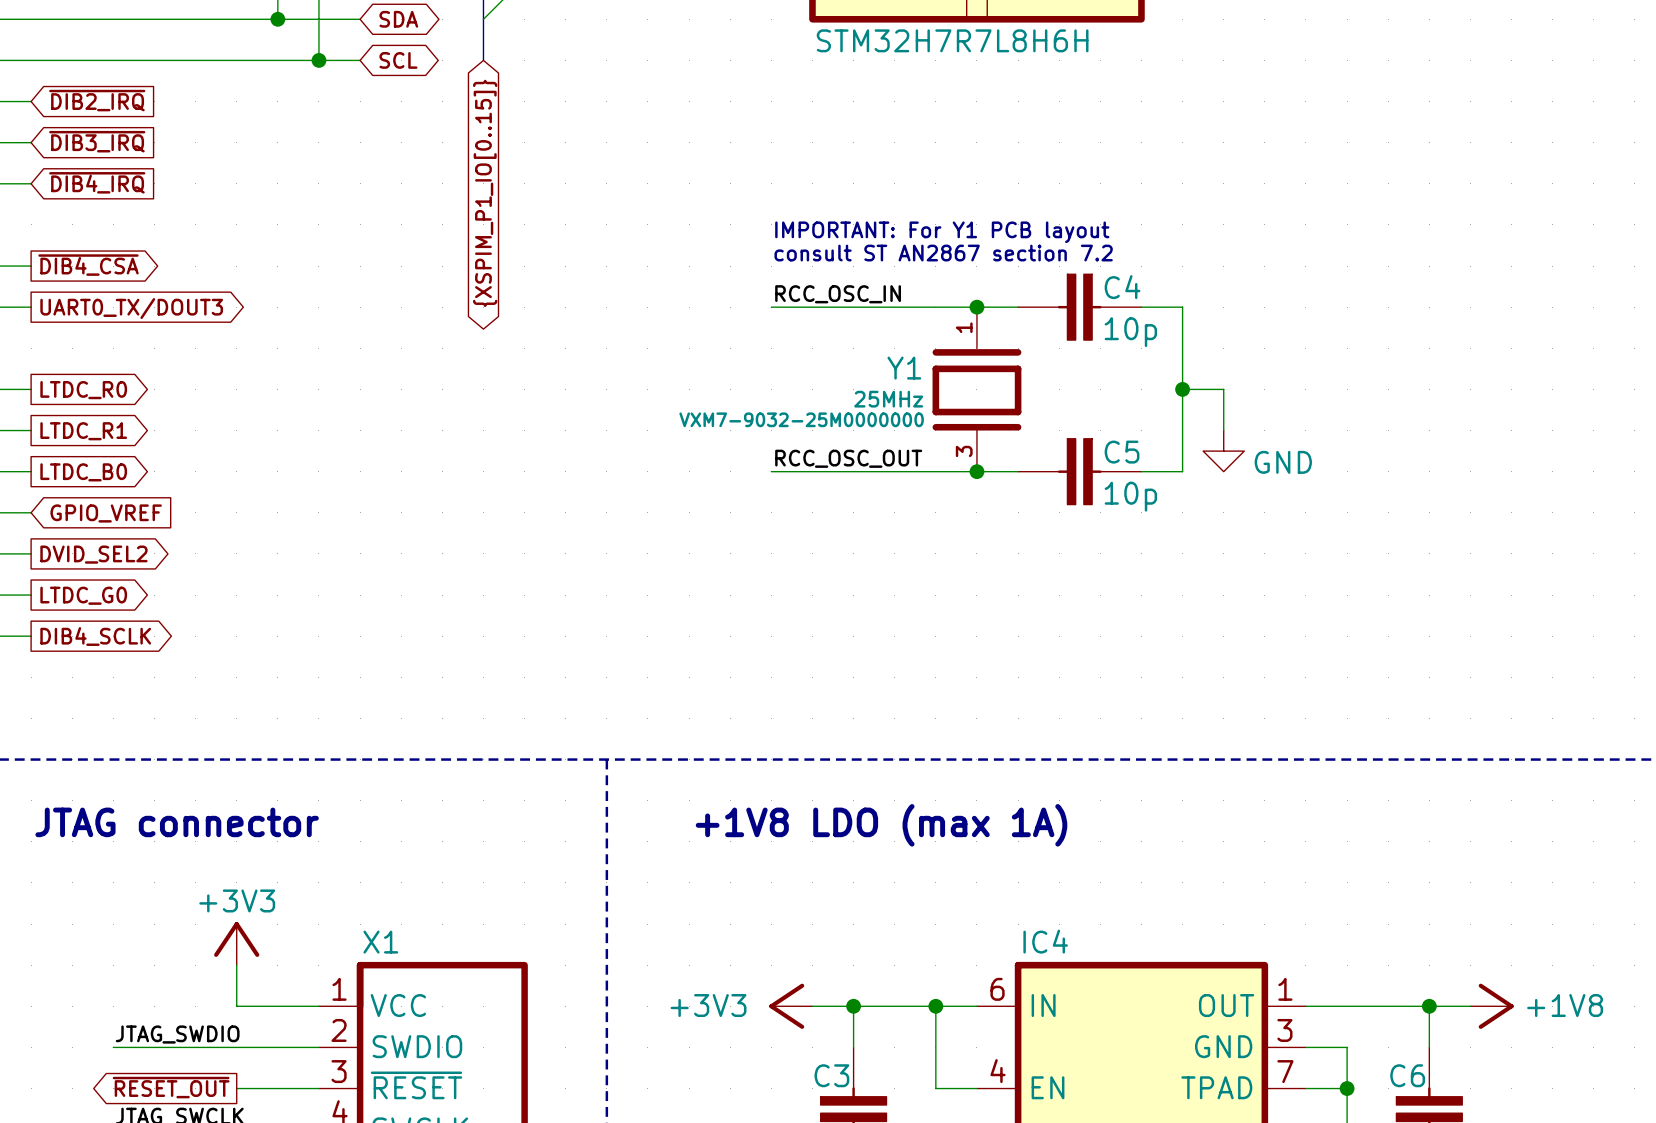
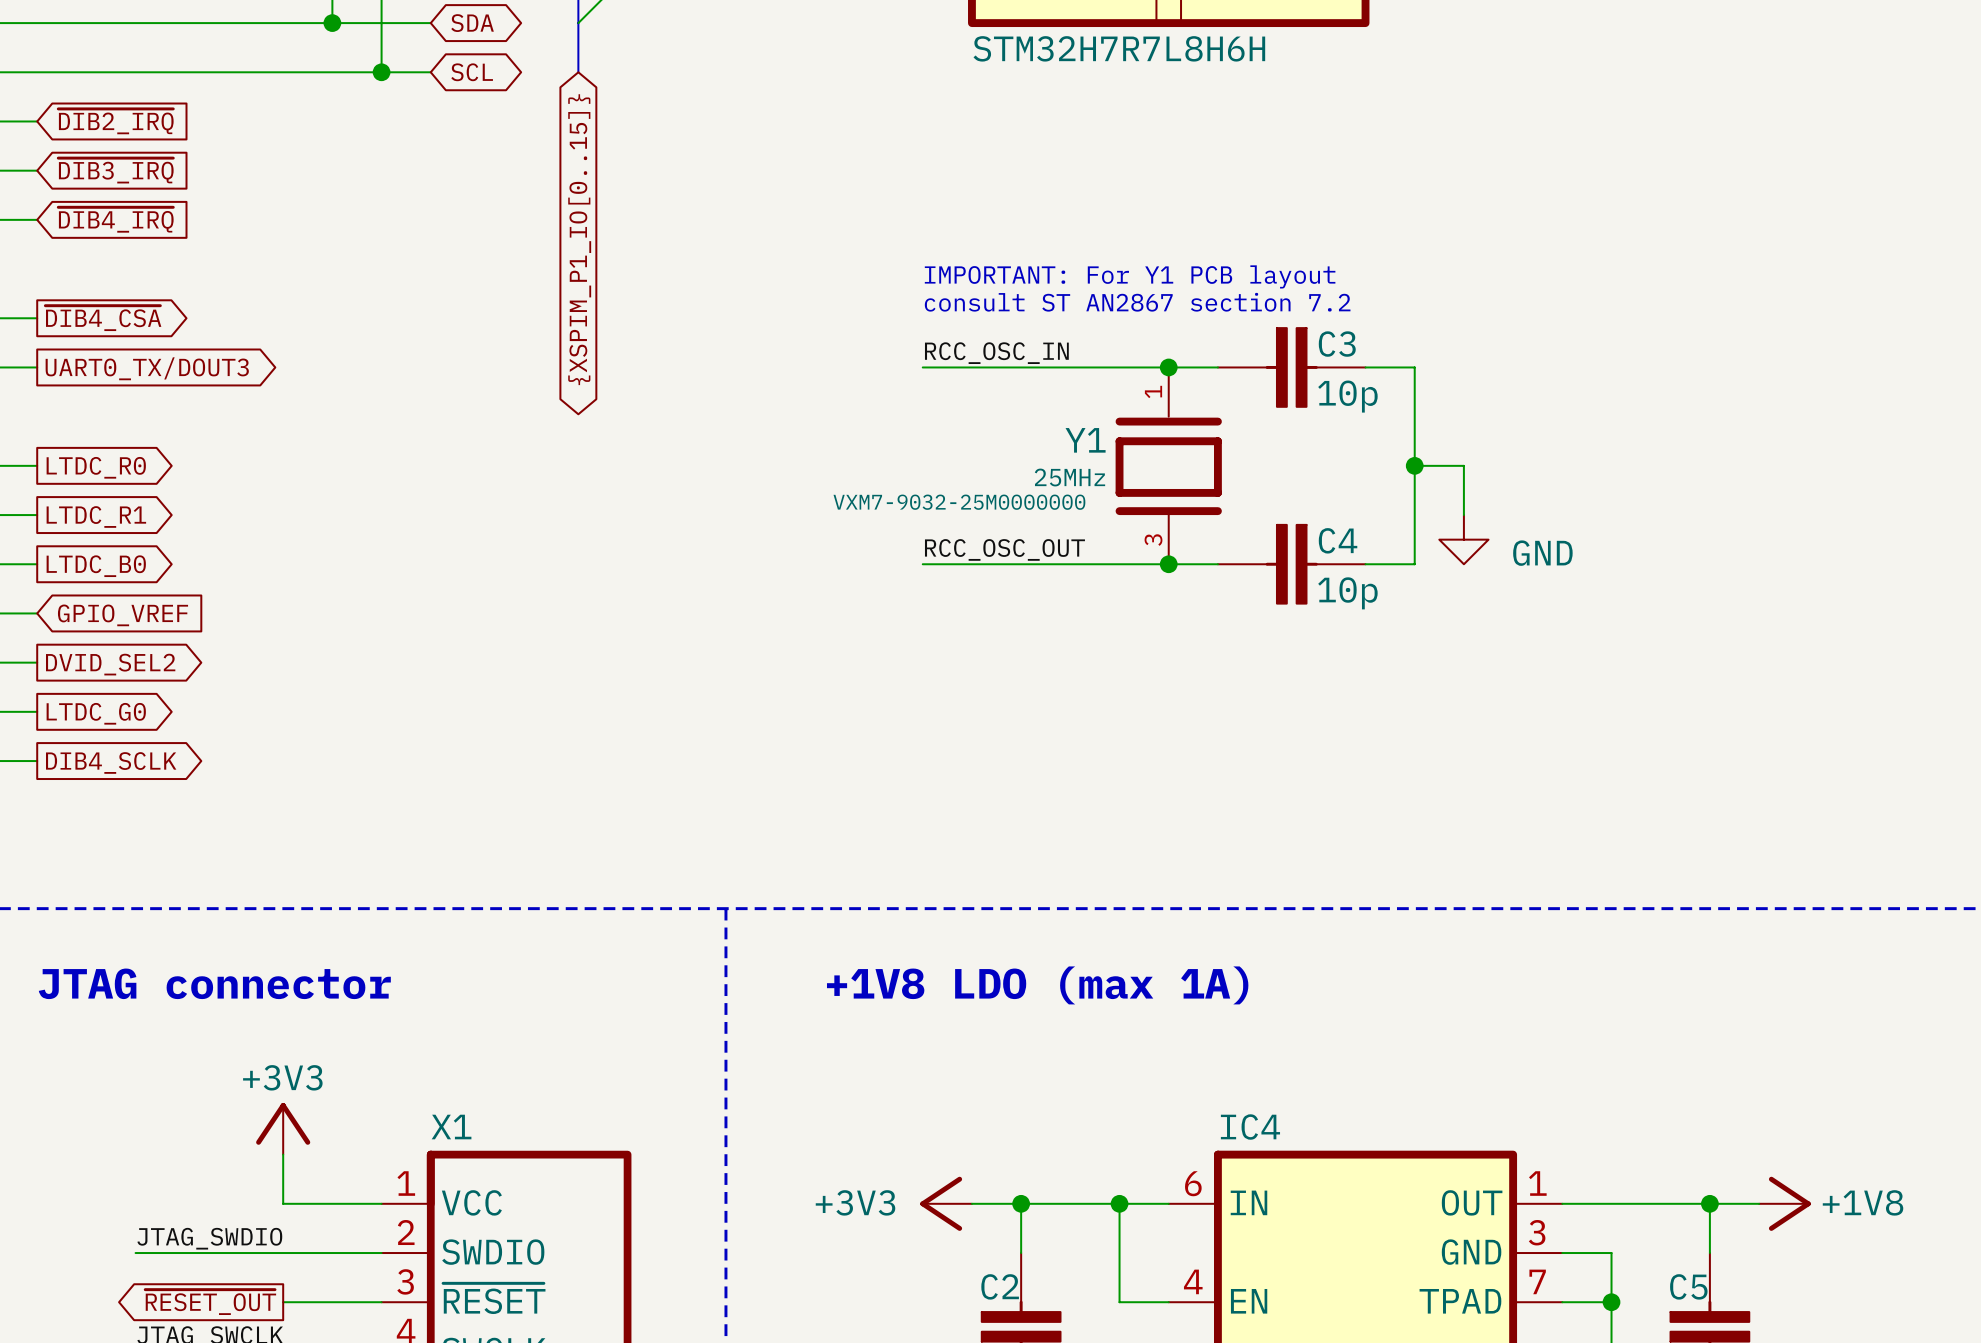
C4 name: C4 (1122, 287) -> C3 (1337, 344)
C5 name: C5 (1122, 452) -> C4 (1338, 540)
C3 name: C3 (831, 1075) -> C2 (1000, 1286)
C6 name: C6 (1407, 1075) -> C5 (1688, 1286)

